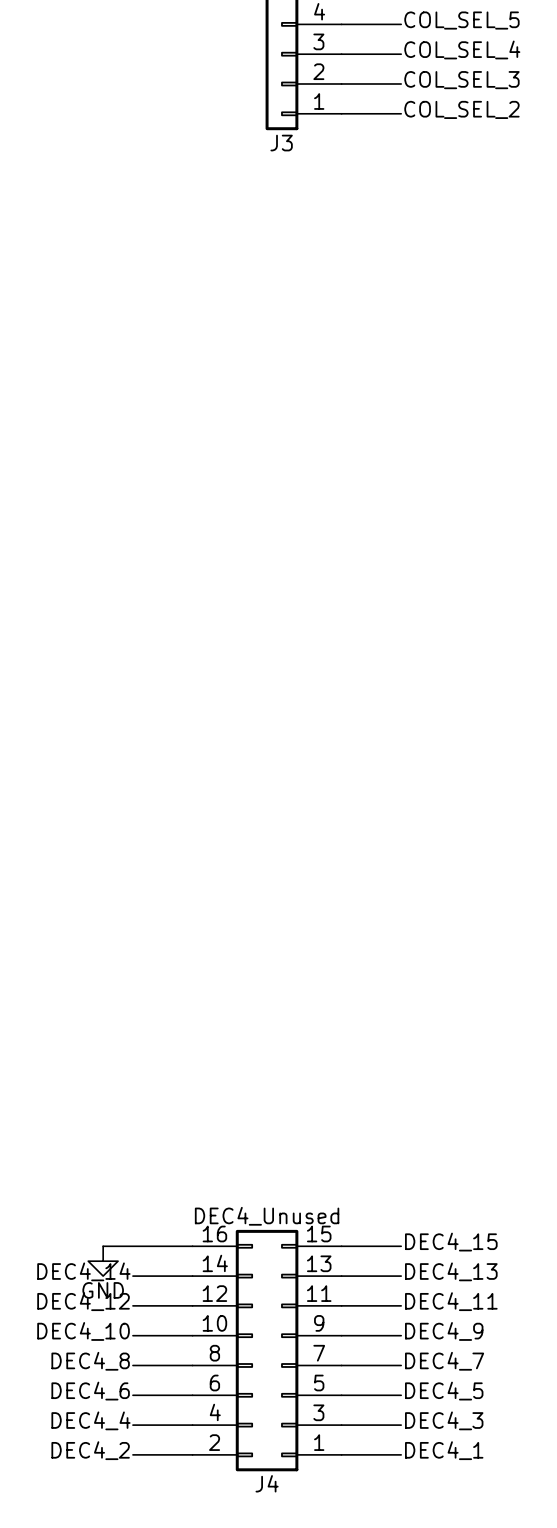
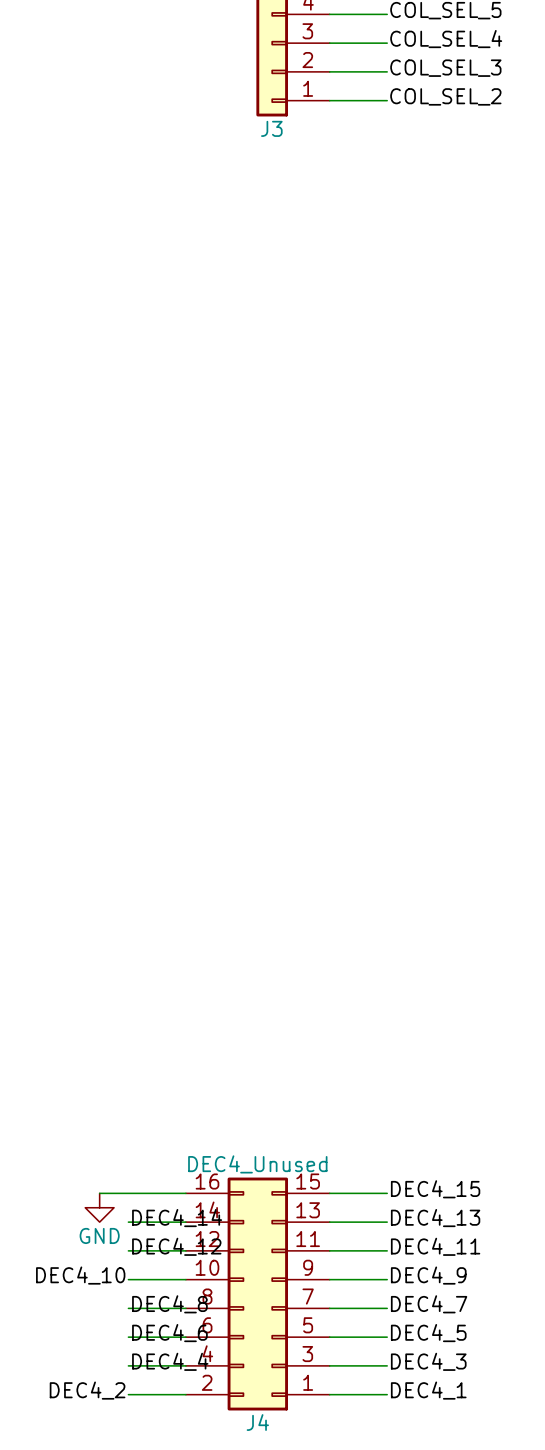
label position: DEC4_14 (83, 1271) -> DEC4_14 (177, 1218)
label position: DEC4_12 (83, 1301) -> DEC4_12 (176, 1246)
label position: DEC4_8 (90, 1361) -> DEC4_8 (169, 1304)
label position: DEC4_6 (90, 1391) -> DEC4_6 (169, 1333)
label position: DEC4_4 (90, 1420) -> DEC4_4 (170, 1361)

